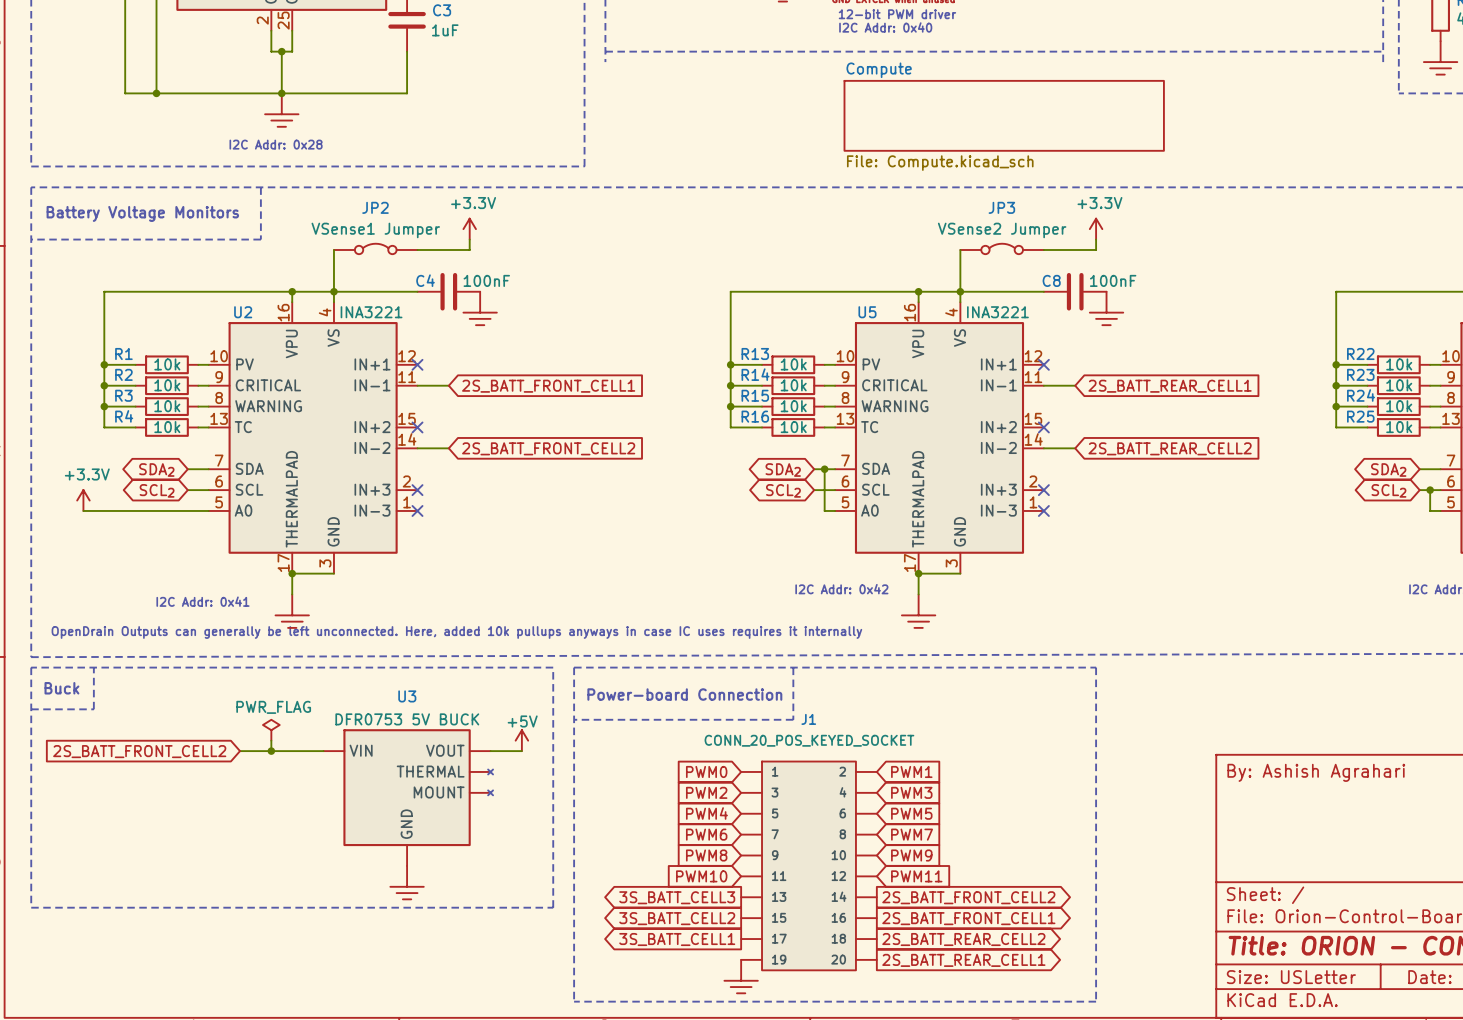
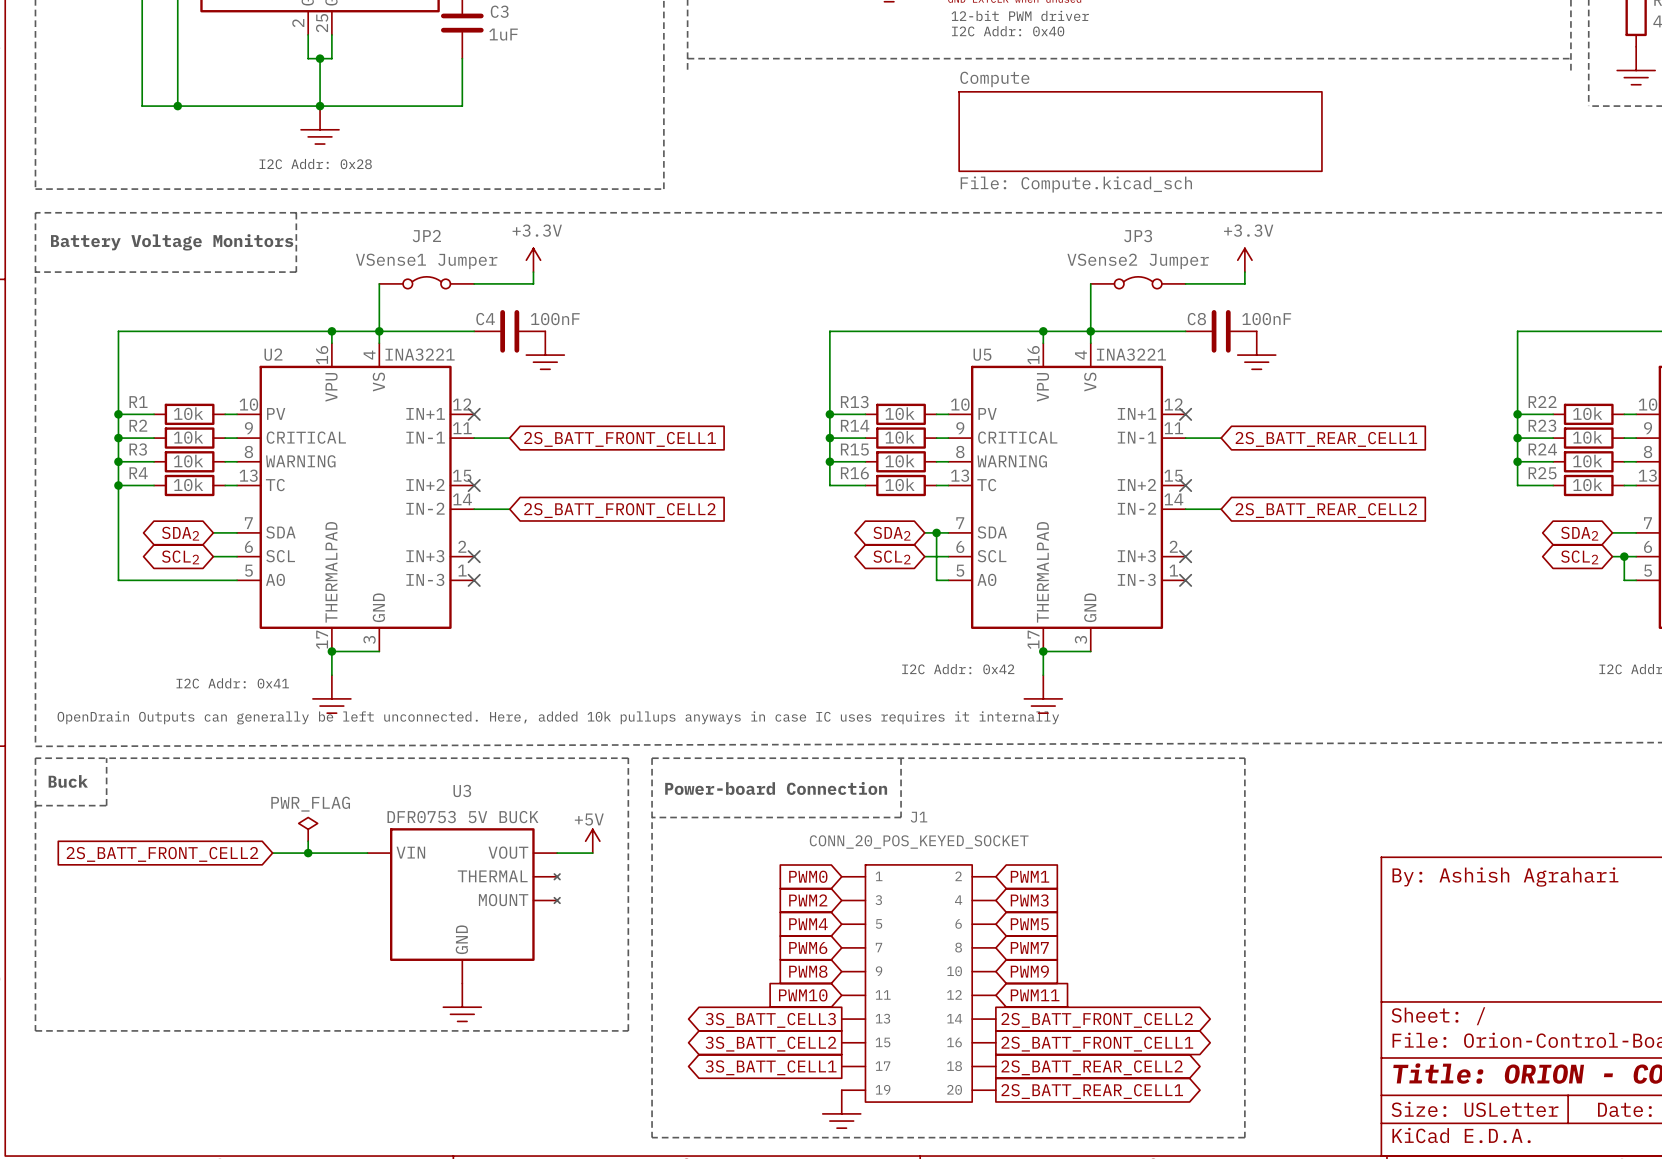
junction: none -> (118, 485)
power symbol: +3.3V (83, 500) -> none
wire: (83, 510) (104, 510) -> (118, 485) (118, 580)

